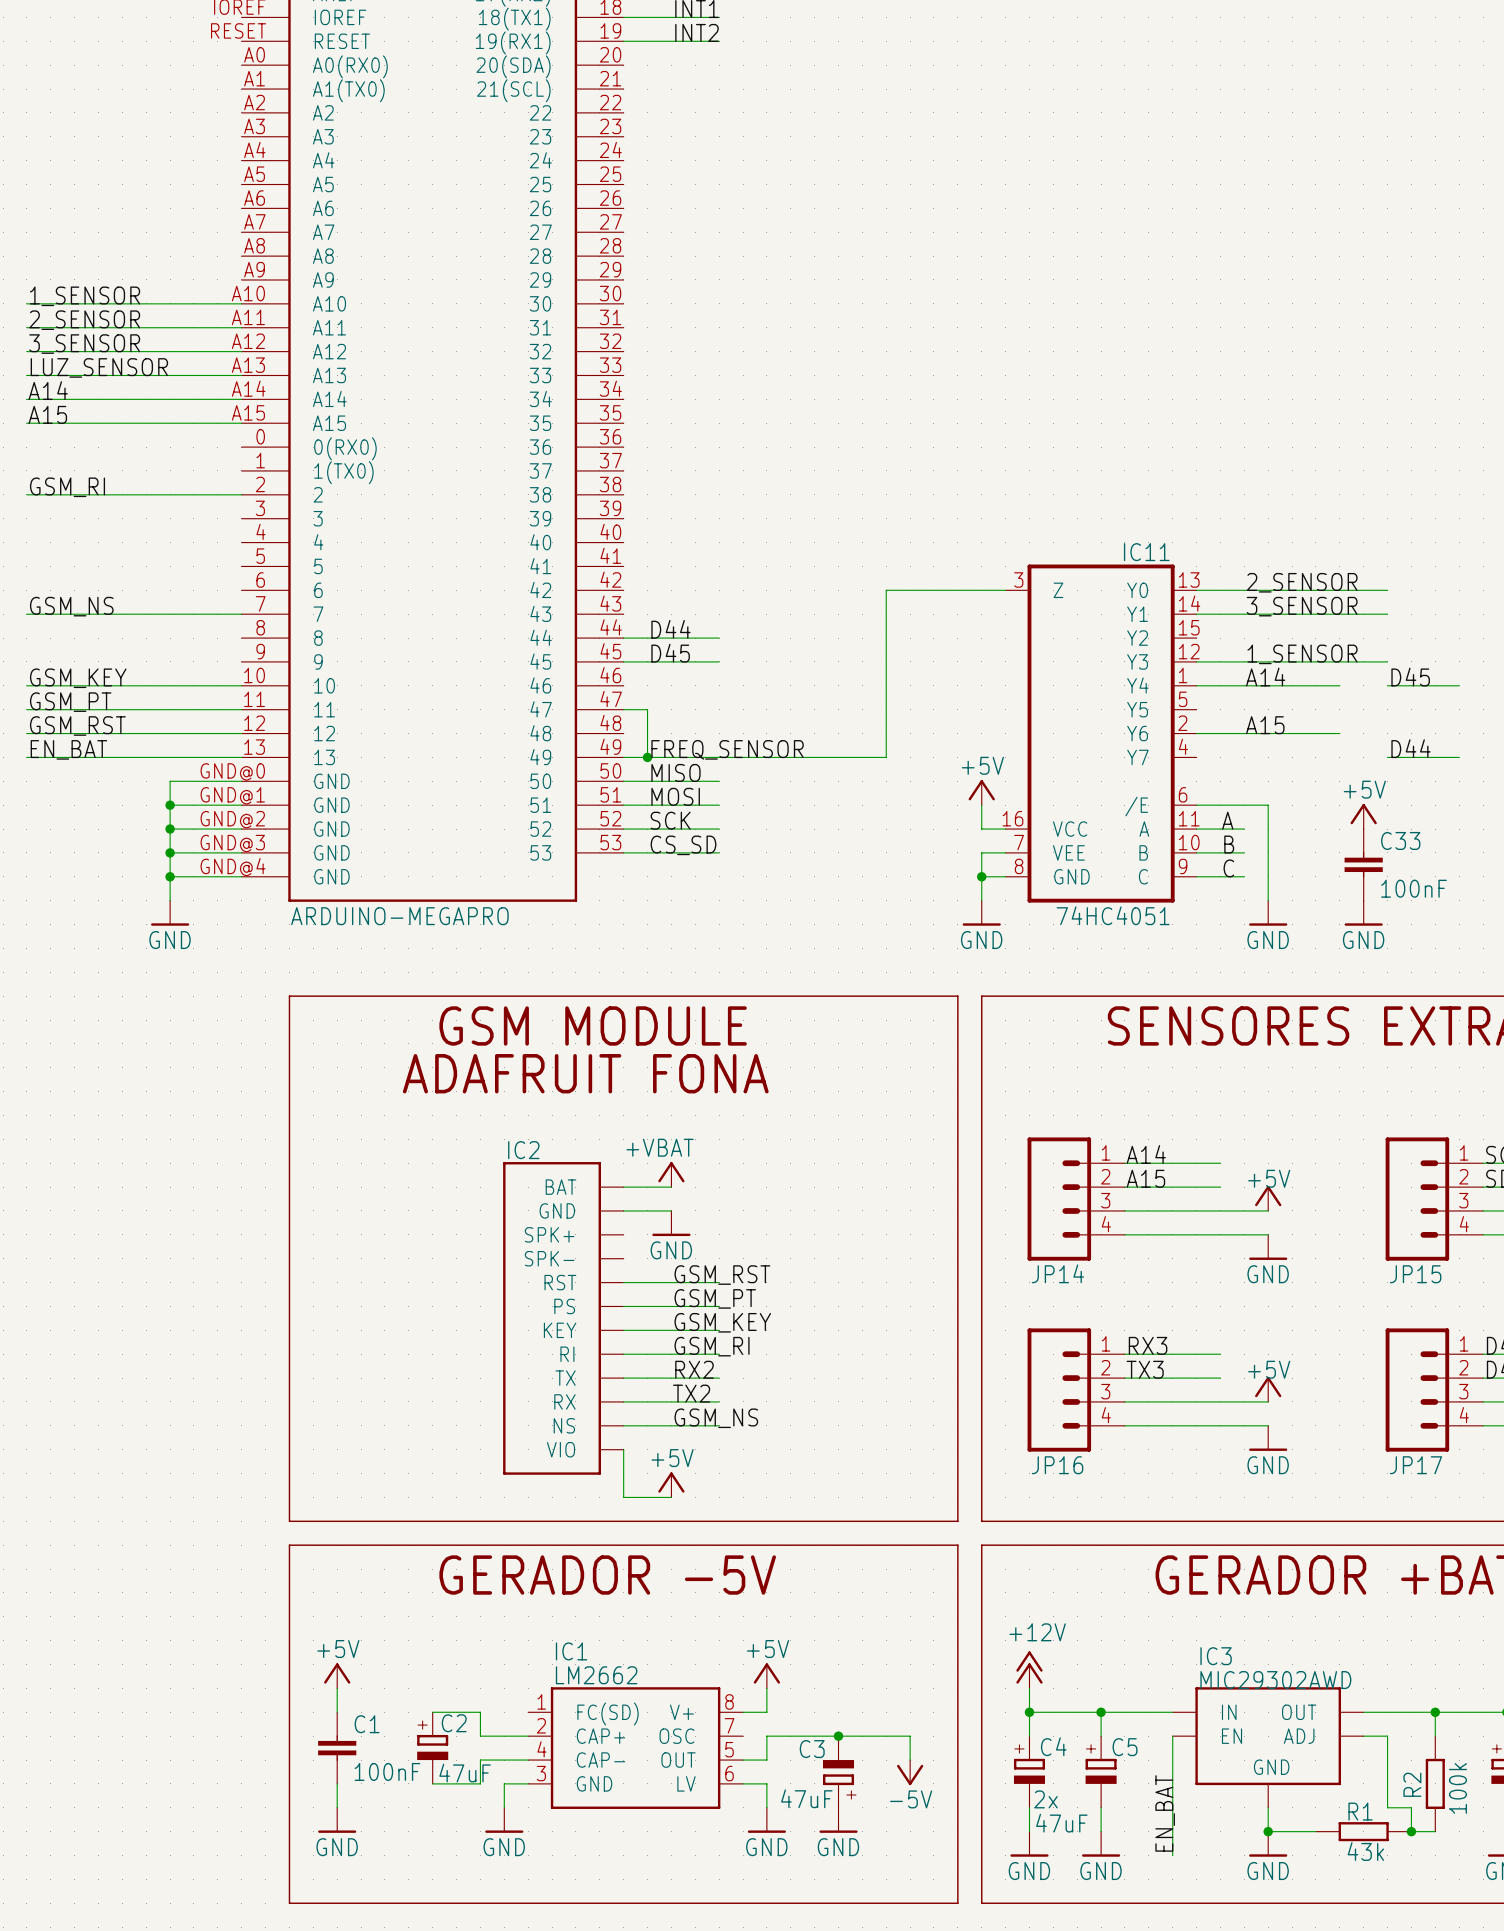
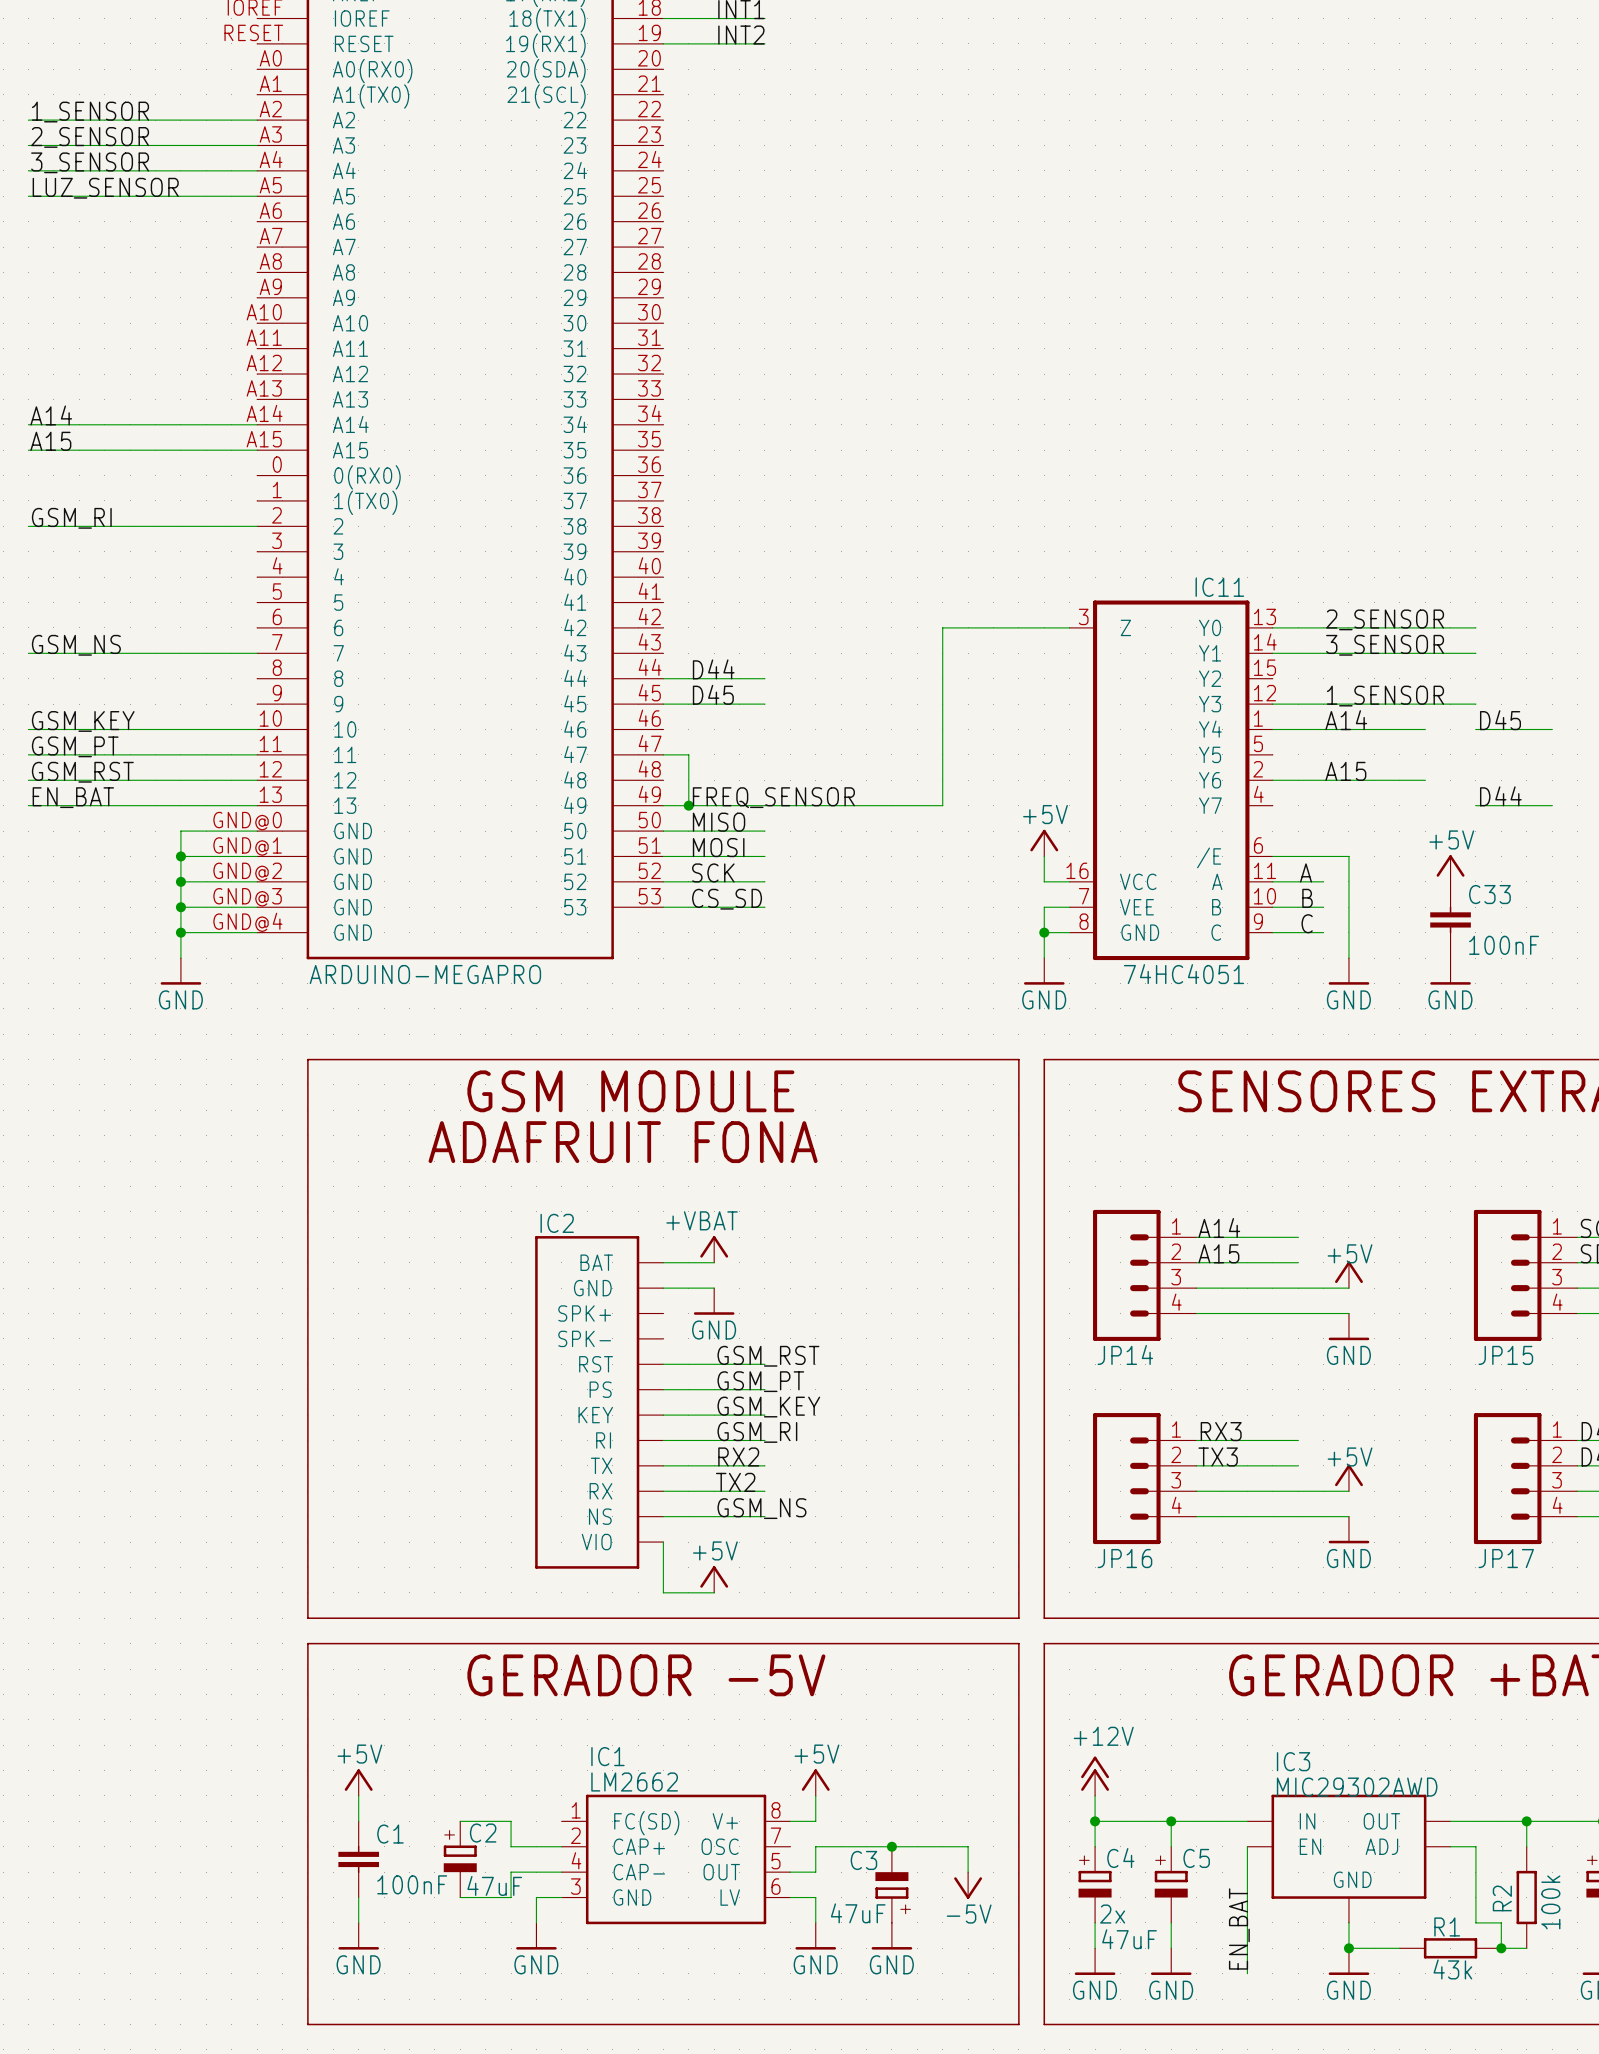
wire: none -> (28, 120) (257, 120)
label position: 1_SENSOR (85, 296) -> 1_SENSOR (90, 112)
wire: (26, 303) (241, 303) -> (28, 196) (257, 196)
label position: 2_SENSOR (84, 320) -> 2_SENSOR (90, 137)
wire: (26, 327) (241, 327) -> (28, 170) (257, 170)
label position: 3_SENSOR (84, 344) -> 3_SENSOR (90, 162)
wire: (26, 351) (241, 351) -> (28, 145) (257, 145)
label position: LUZ_SENSOR (99, 367) -> LUZ_SENSOR (105, 188)
wire: (26, 375) (241, 375) -> none

